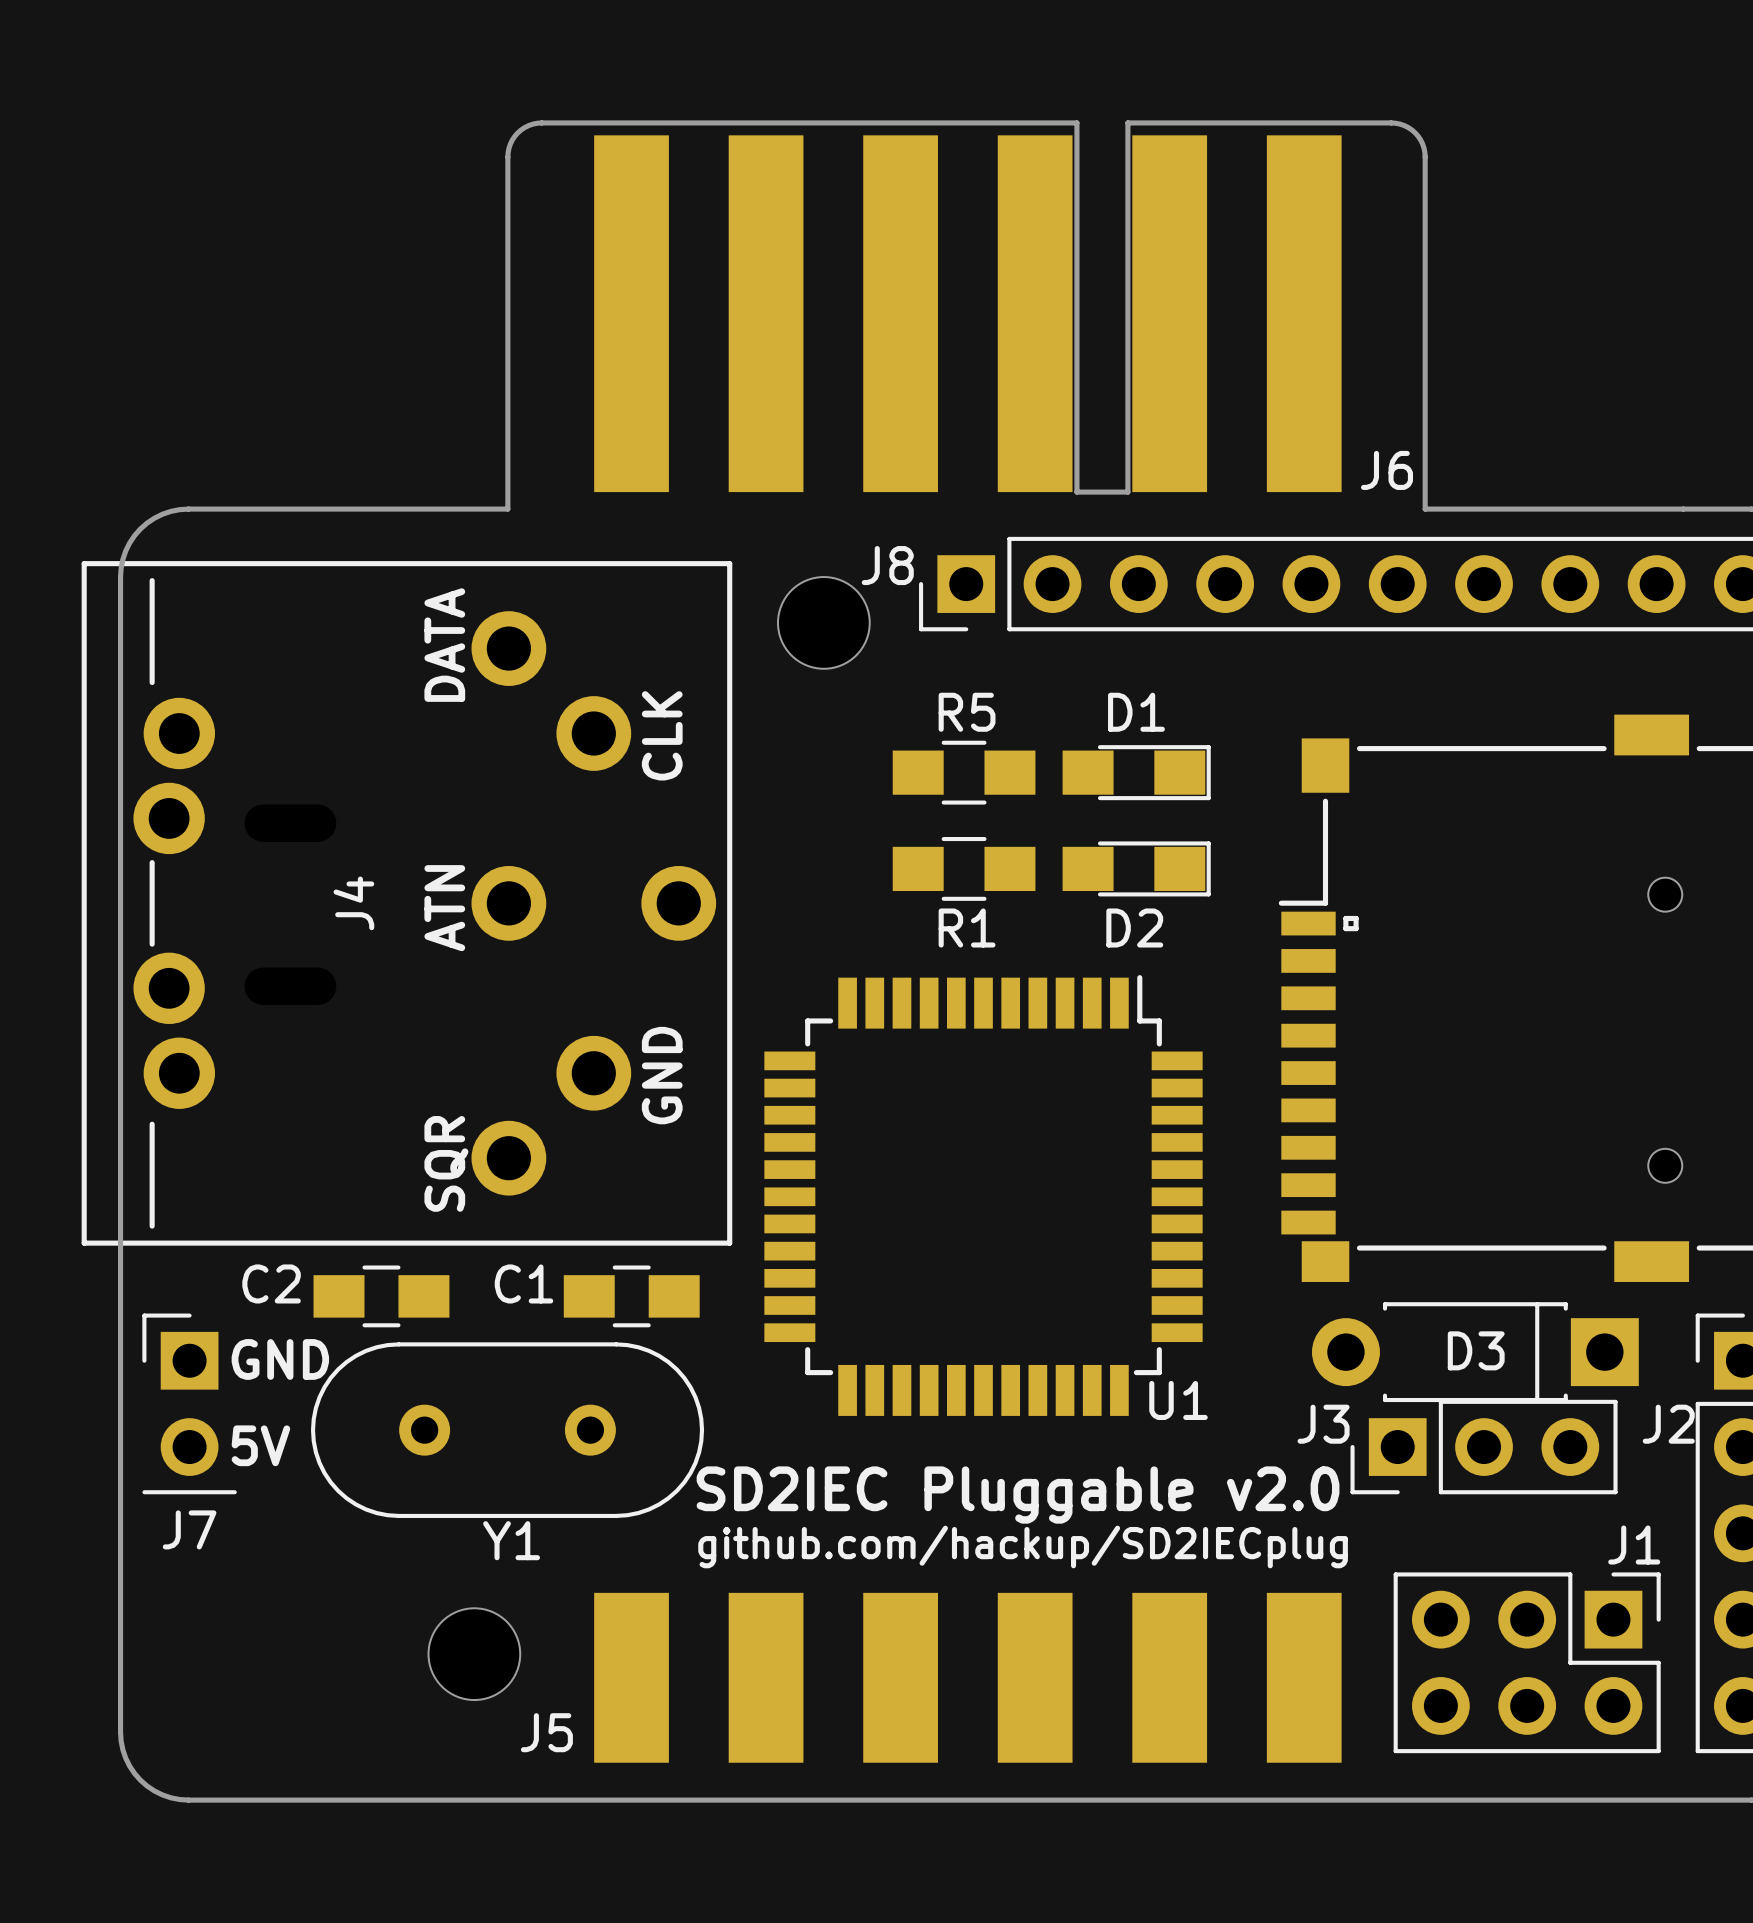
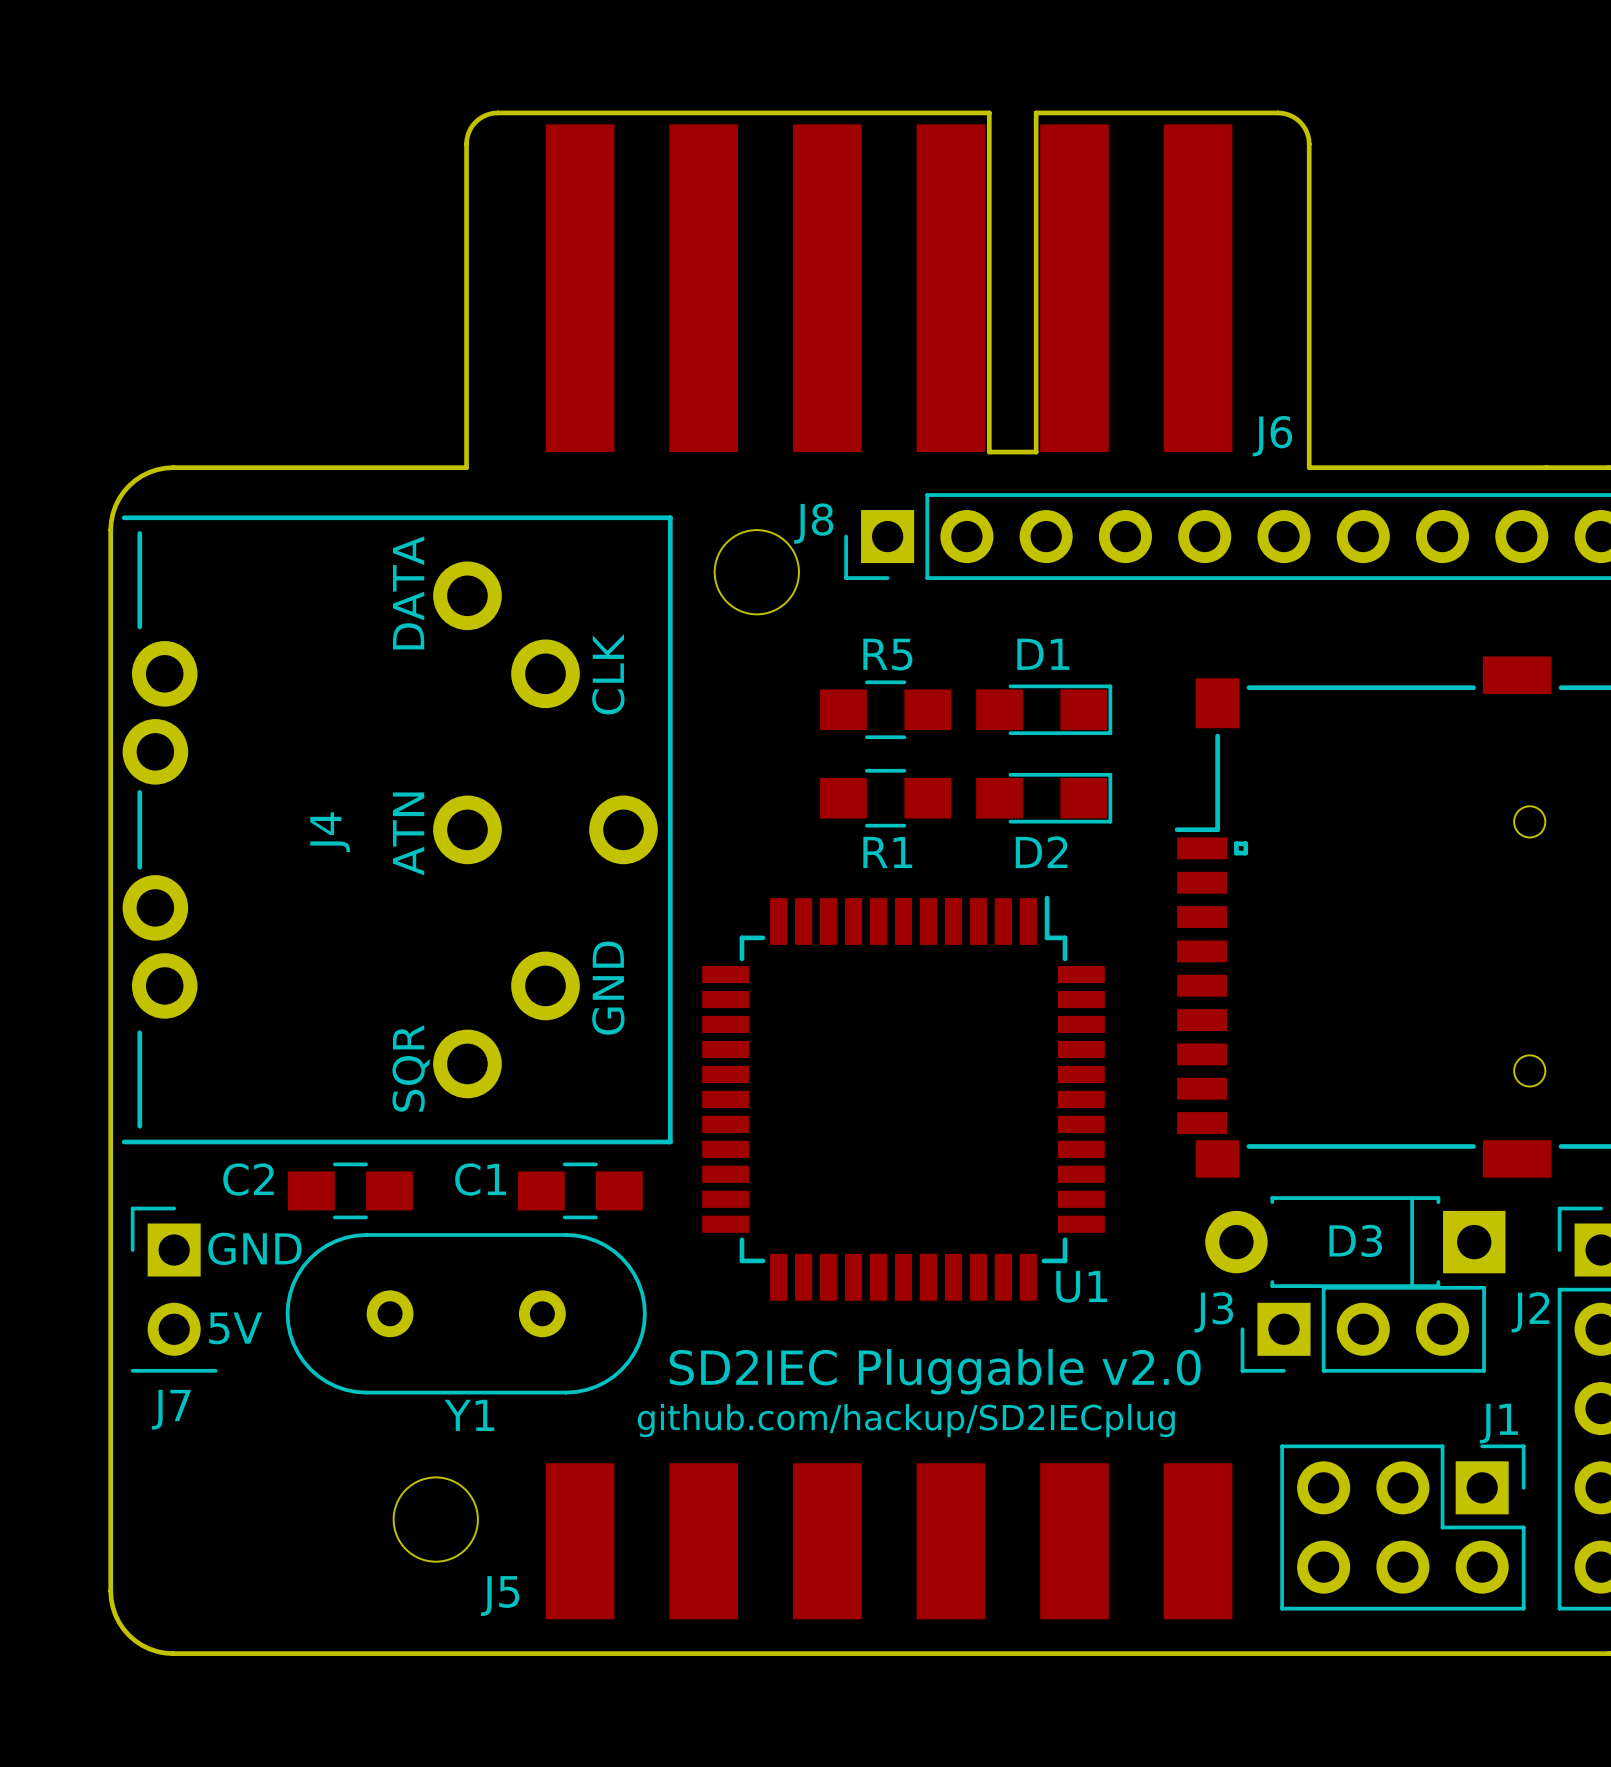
J4 footprint: [81, 561, 733, 1246] -> [121, 515, 673, 1145]

